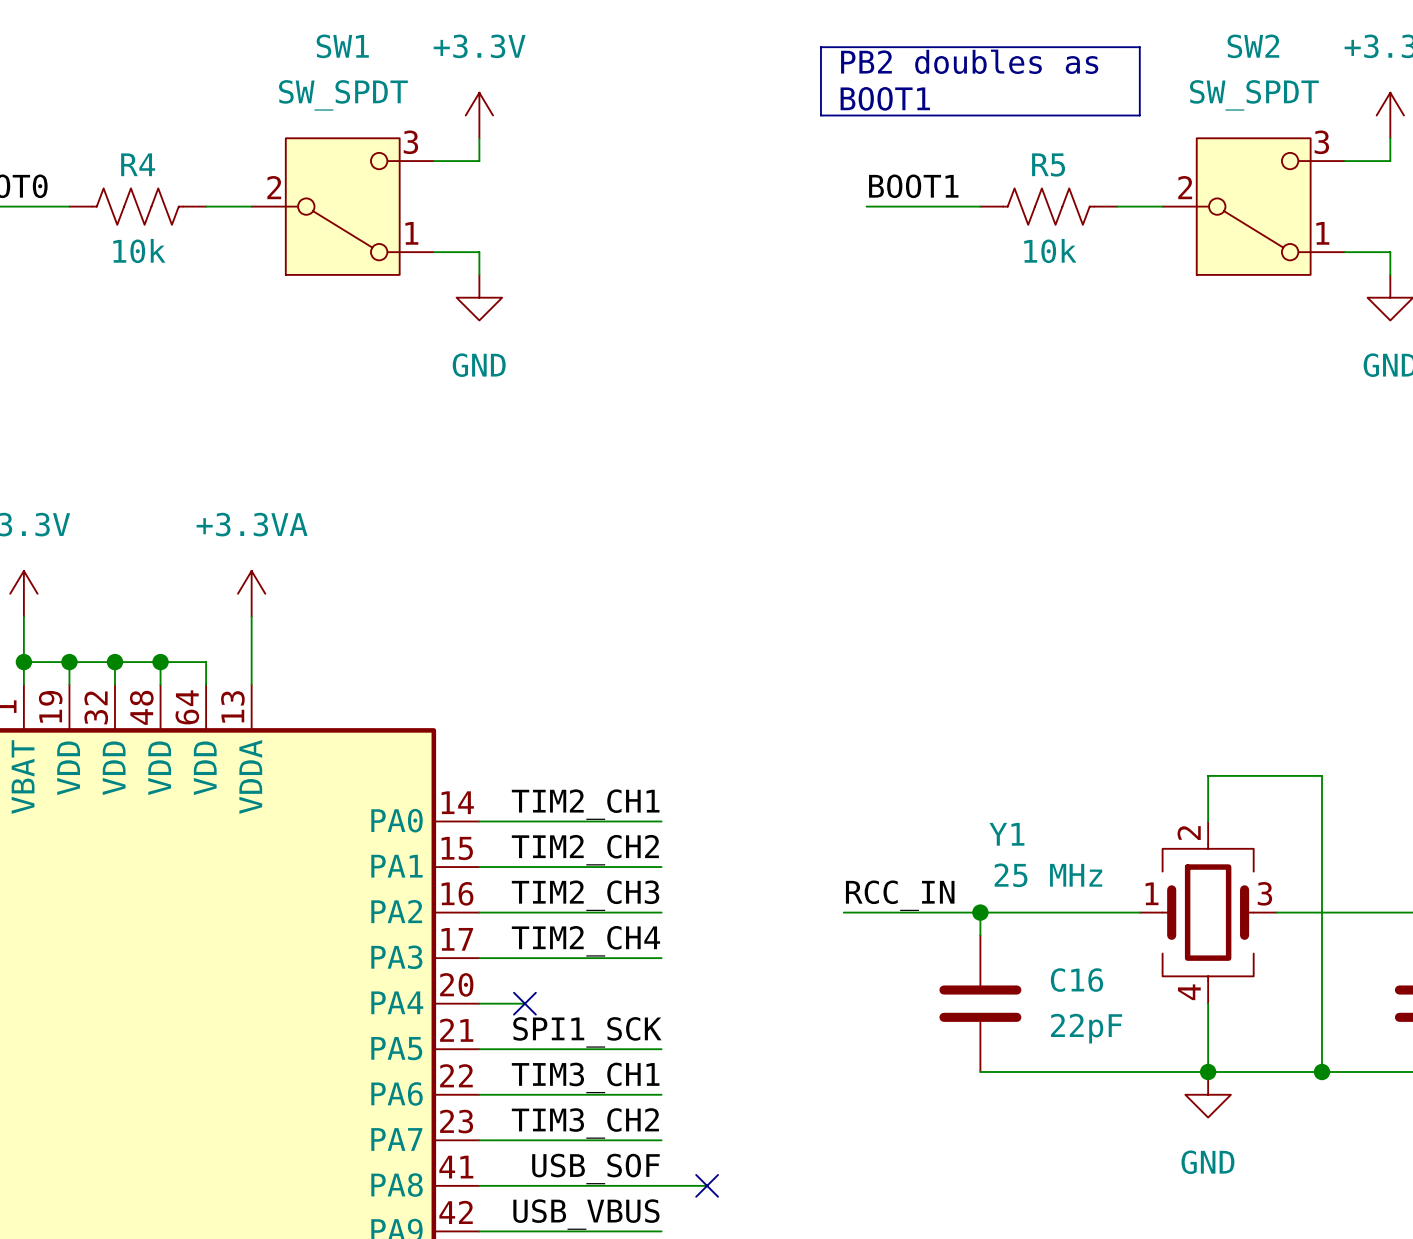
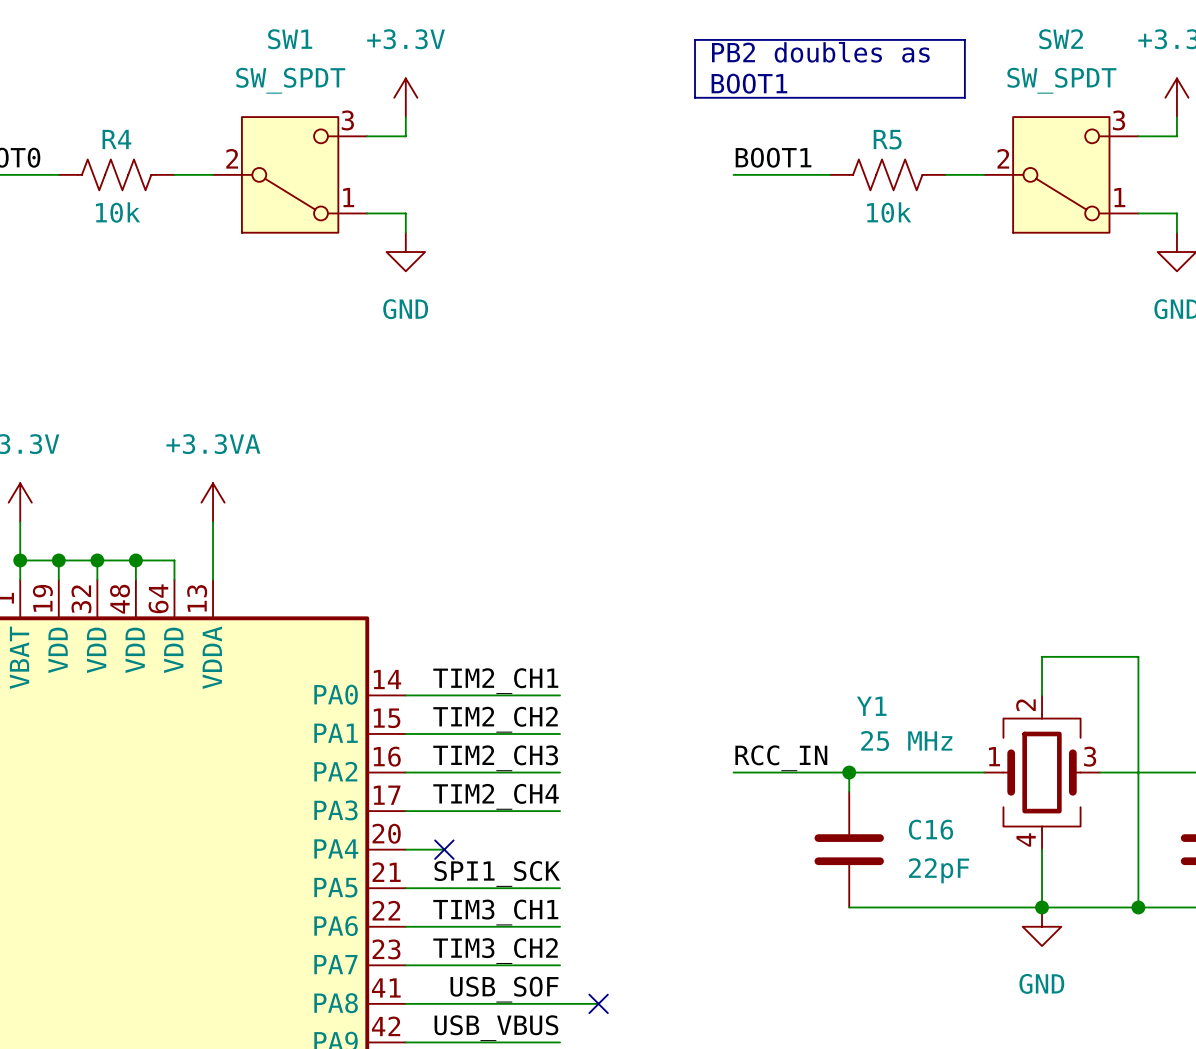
wire: (1230, 775) (1208, 775) (1208, 821) -> (1042, 656) (1042, 695)
wire: (1322, 775) (1322, 1072) -> (1119, 656) (1138, 656) (1138, 907)
label position: RCC_IN (900, 895) -> RCC_IN (781, 758)
wire: (843, 912) (866, 912) -> none
wire: (980, 912) (980, 935) -> (849, 772) (849, 791)
junction position: (980, 912) -> (849, 772)
Y1 position: (1208, 912) -> (1042, 772)
C16 position: (980, 1003) -> (849, 849)
wire: (1208, 1003) (1208, 1072) -> (1042, 849) (1042, 907)
wire: (980, 1072) (1003, 1072) -> none
junction position: (1208, 1072) -> (1042, 907)
junction position: (1322, 1072) -> (1138, 907)
power symbol position: GND (1208, 1094) -> GND (1042, 926)

